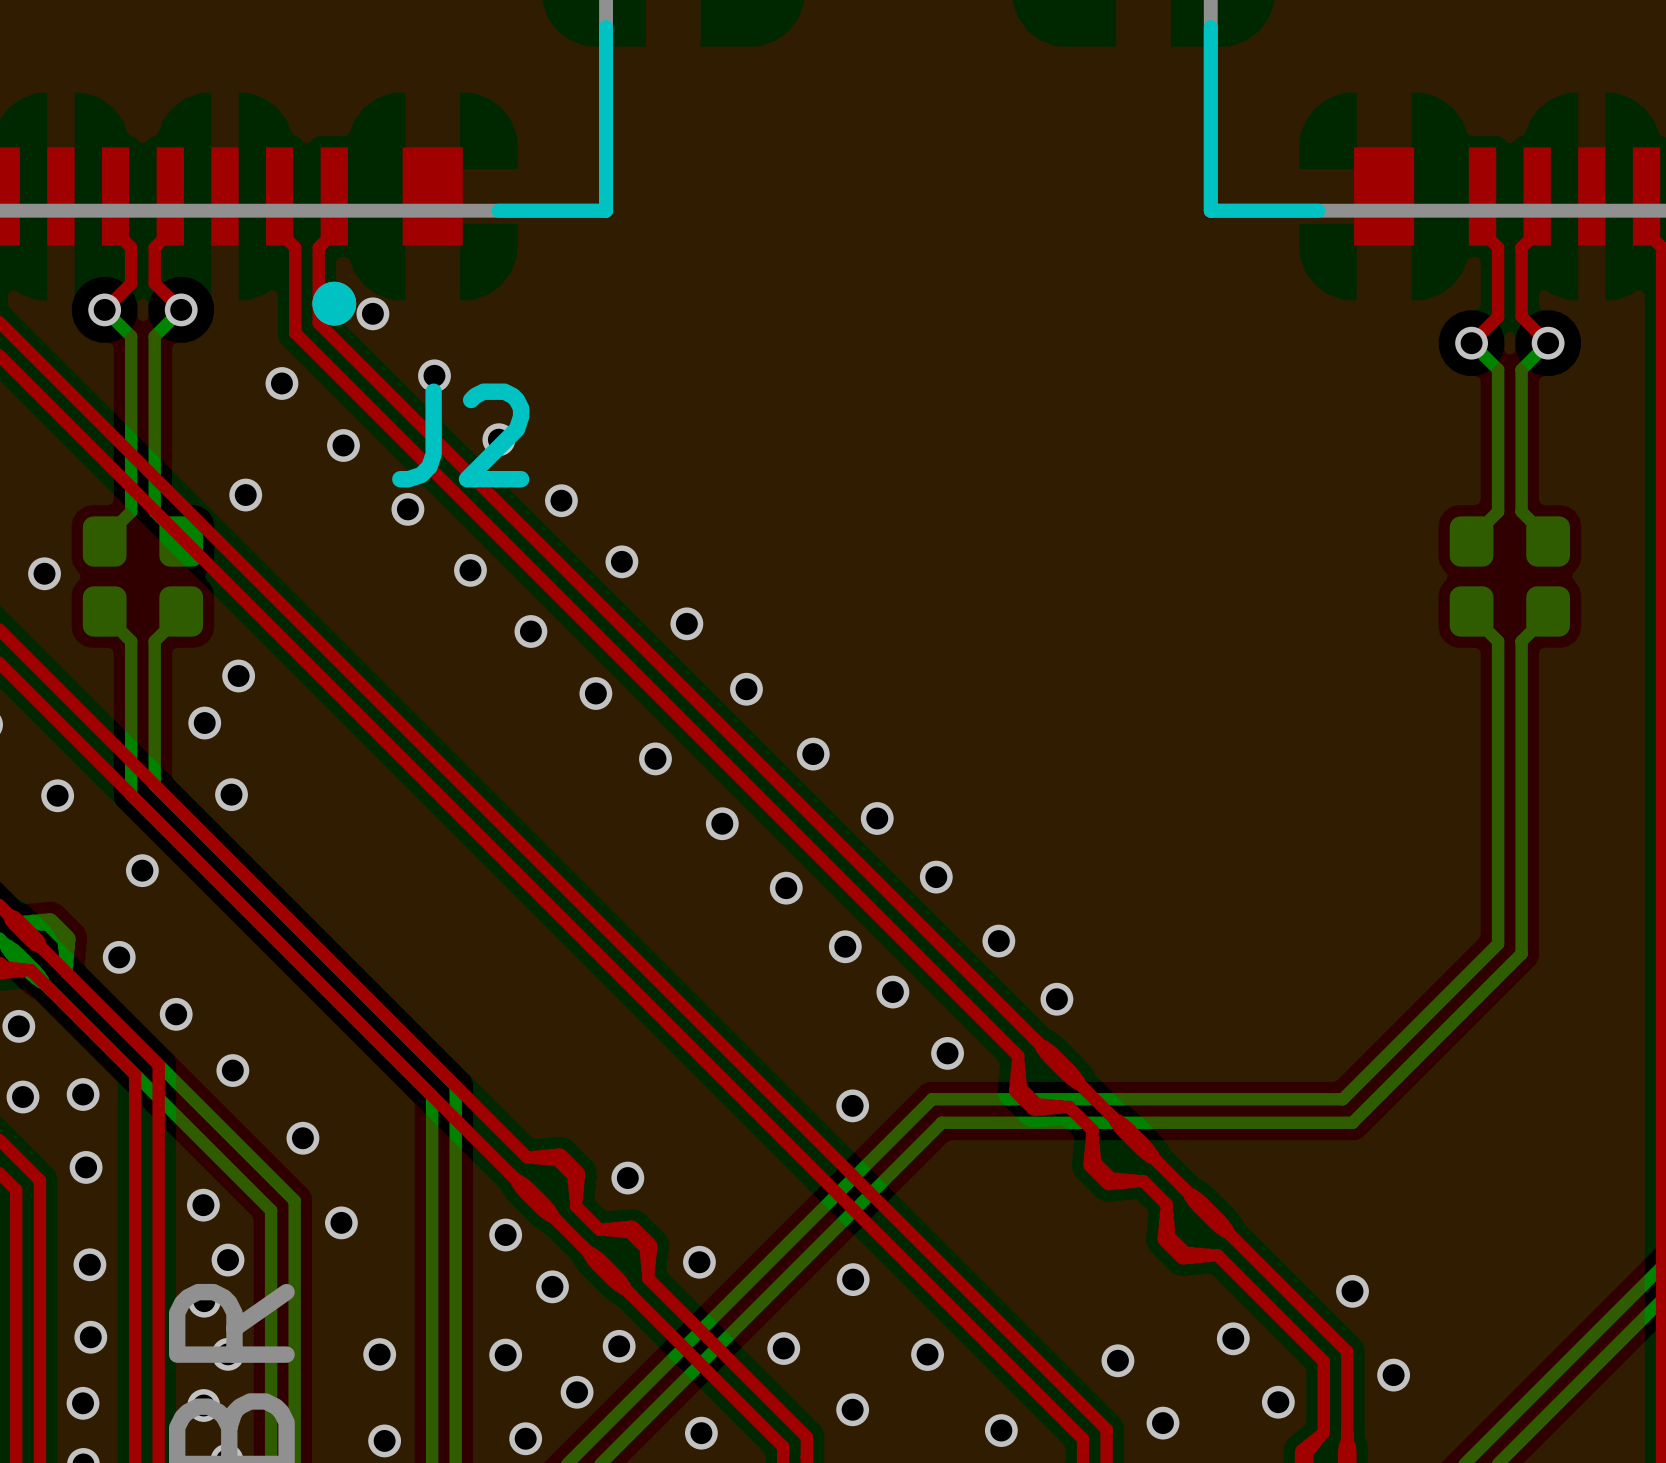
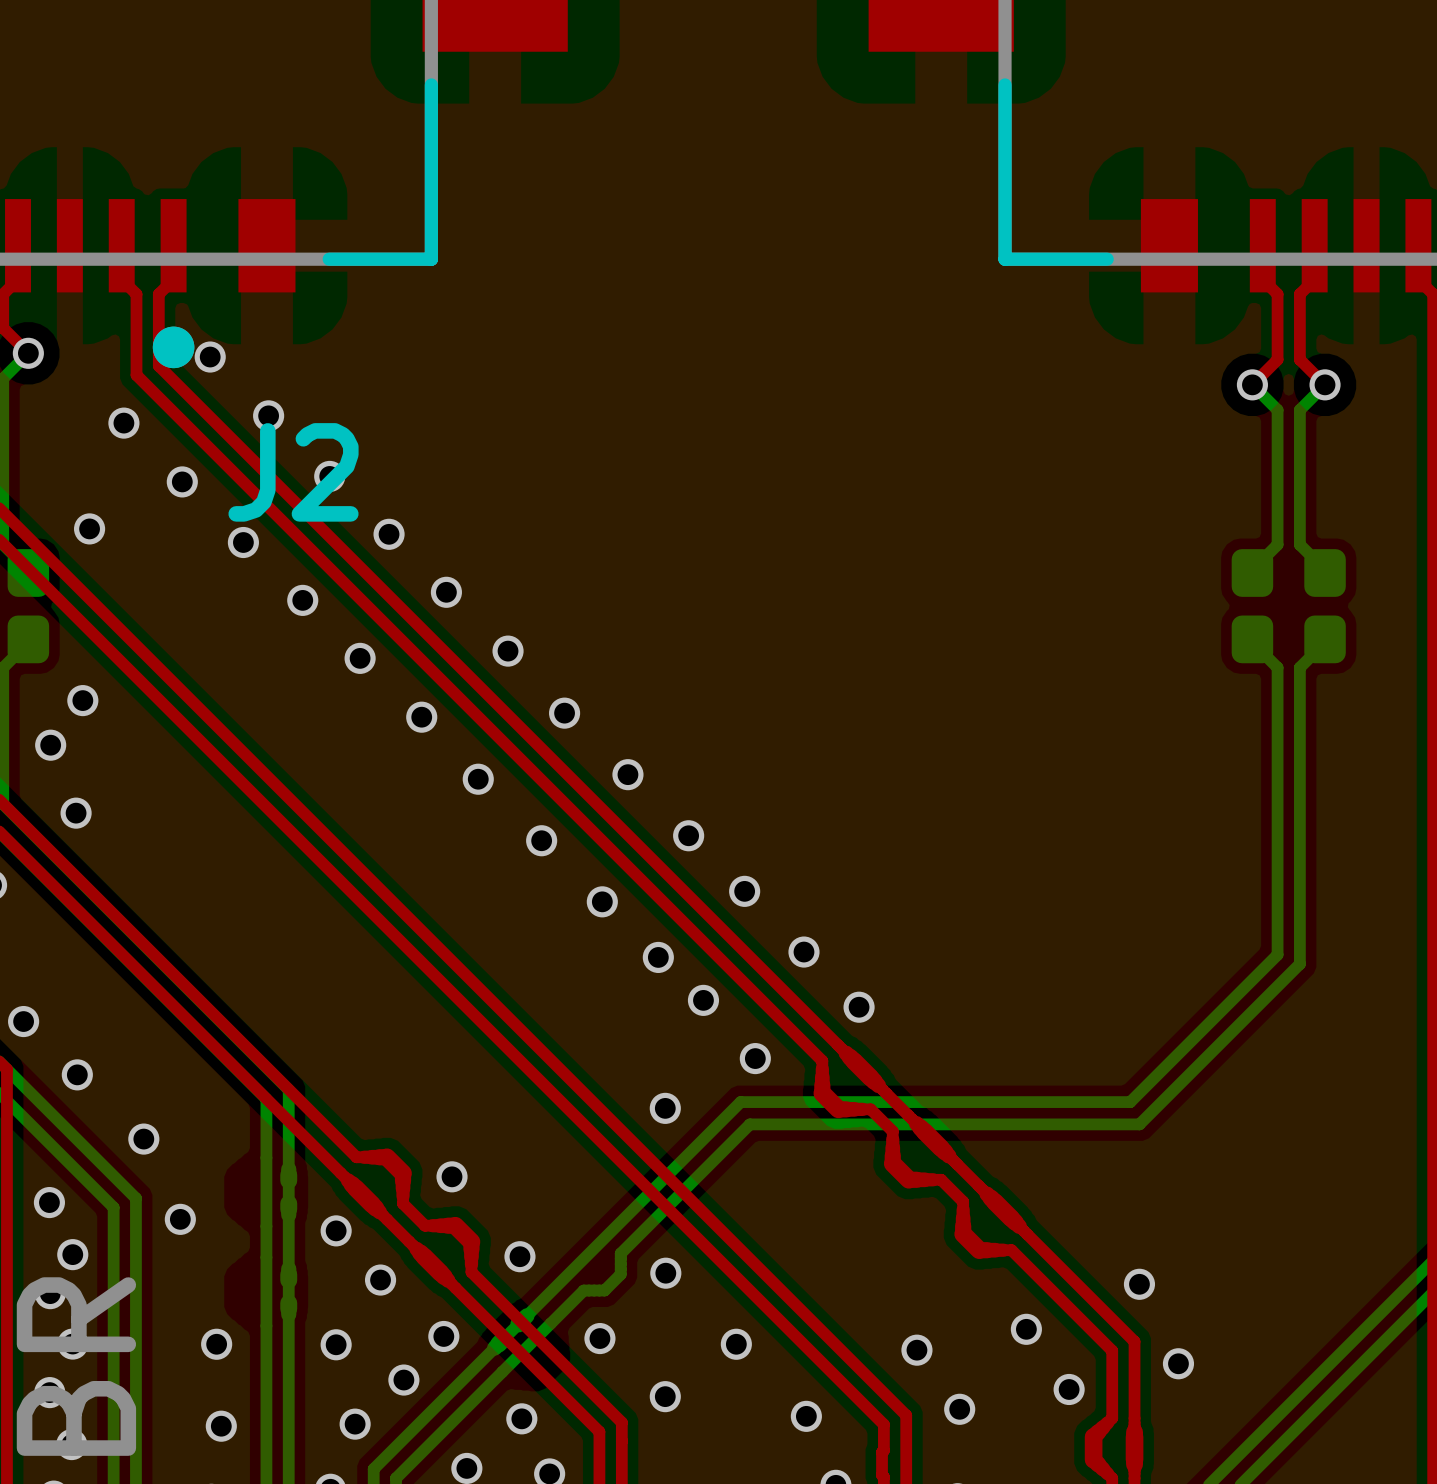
bottom track: (805, 1258) (766, 1297) -> (620, 1253) (620, 1274) (604, 1290) (583, 1290)

